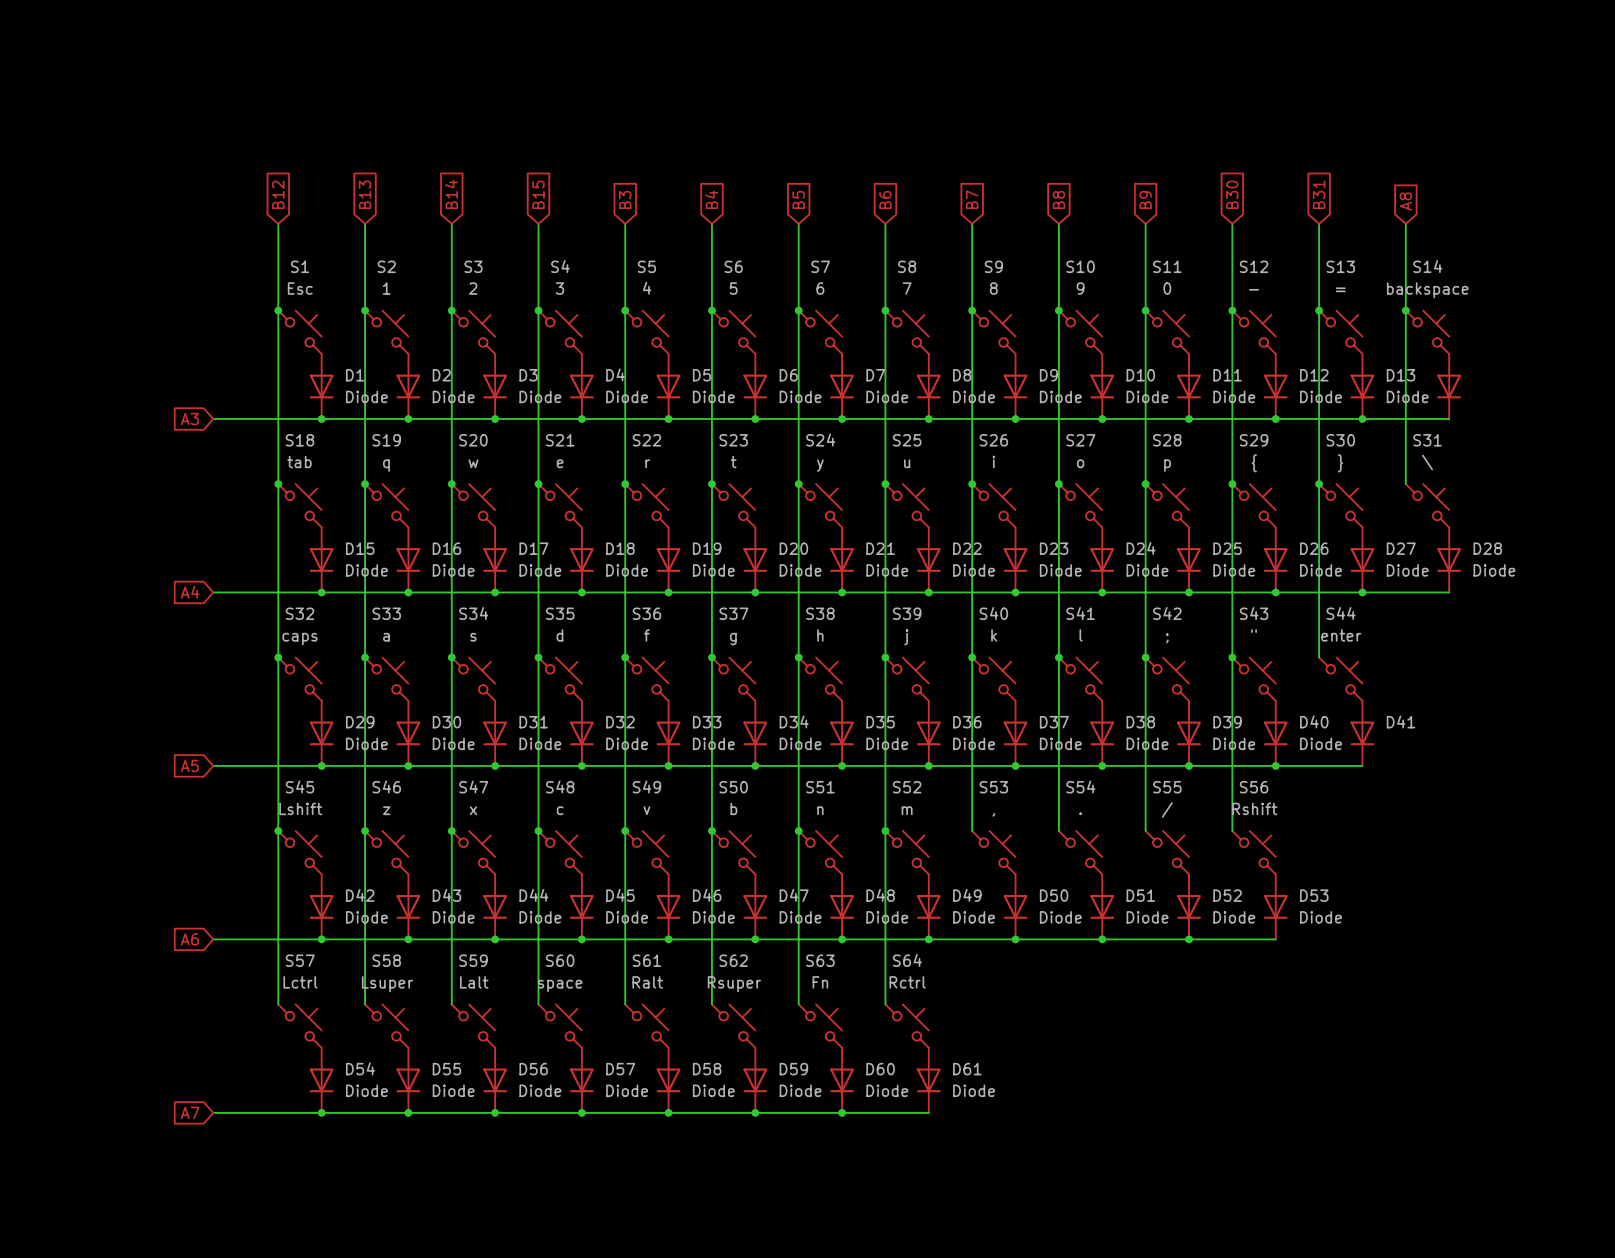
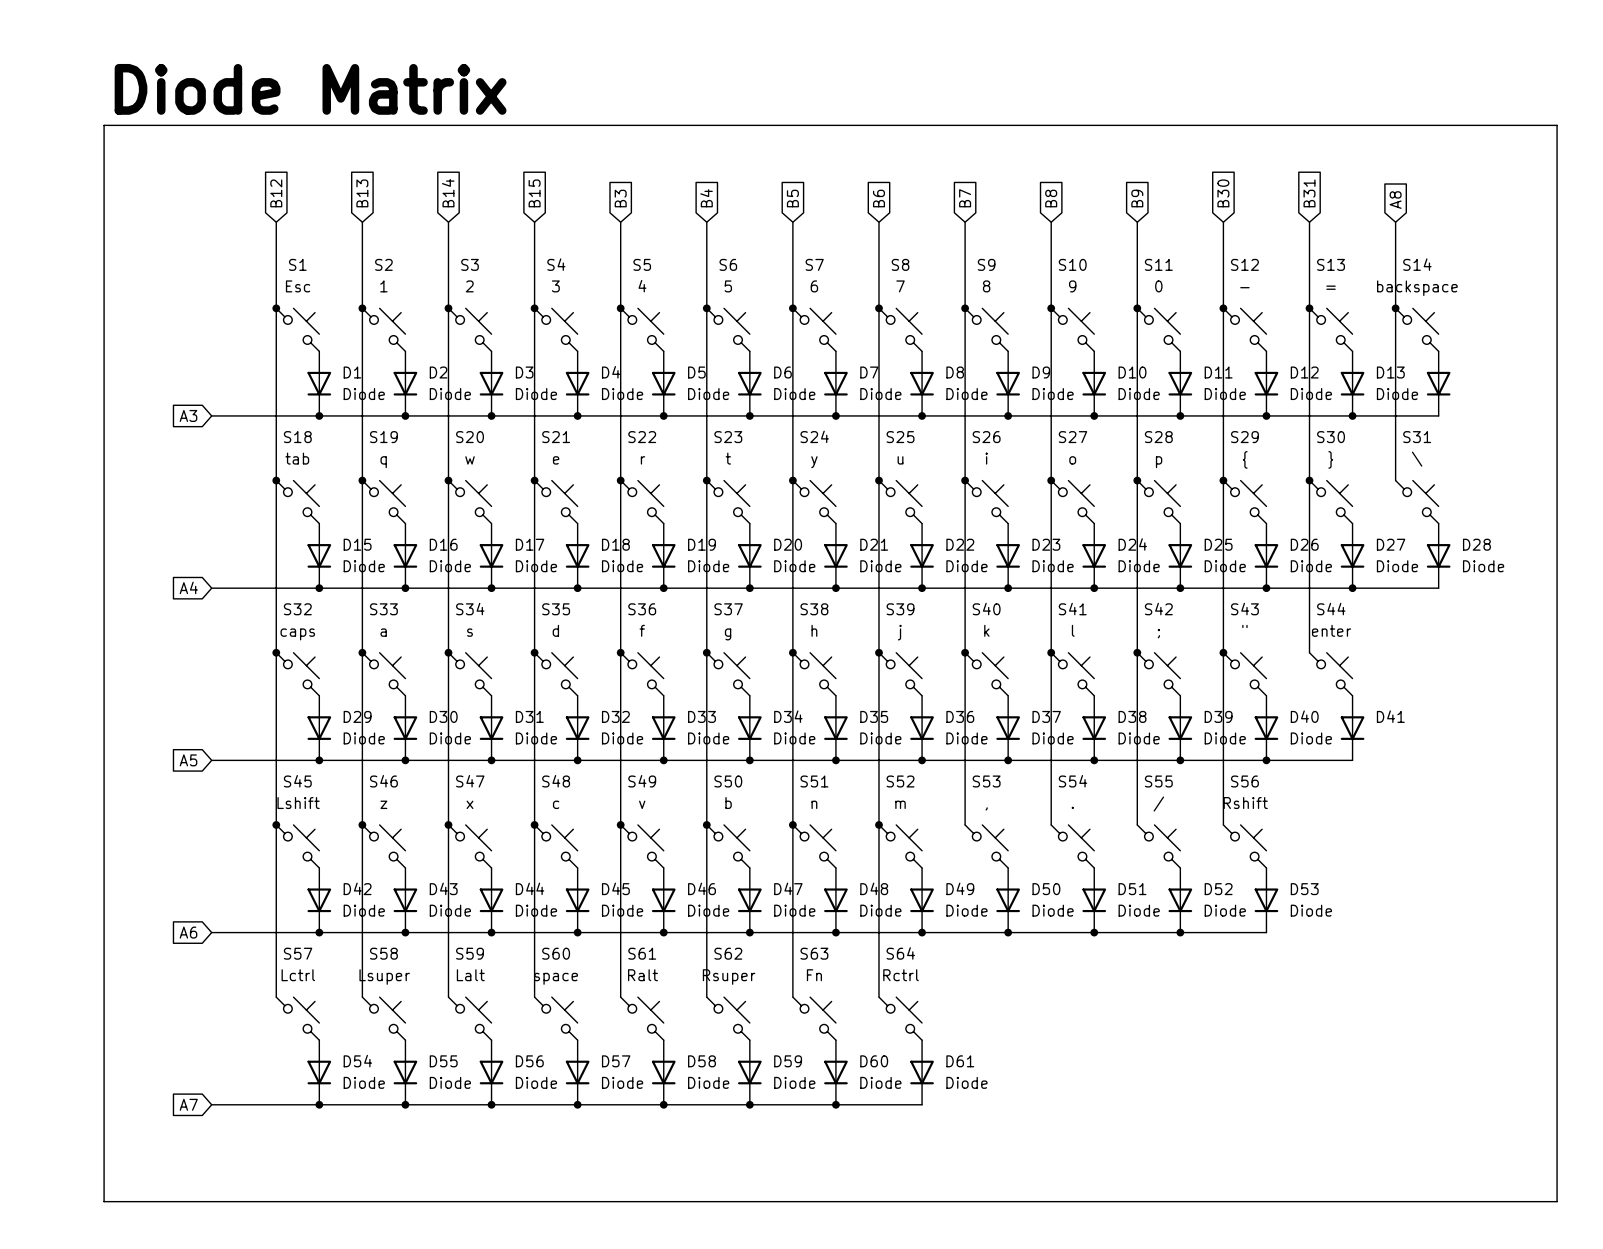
text: none -> Diode Matrix (310, 89)
line: none -> (104, 125) (1557, 125) (1557, 1201) (104, 1201) (104, 125)

